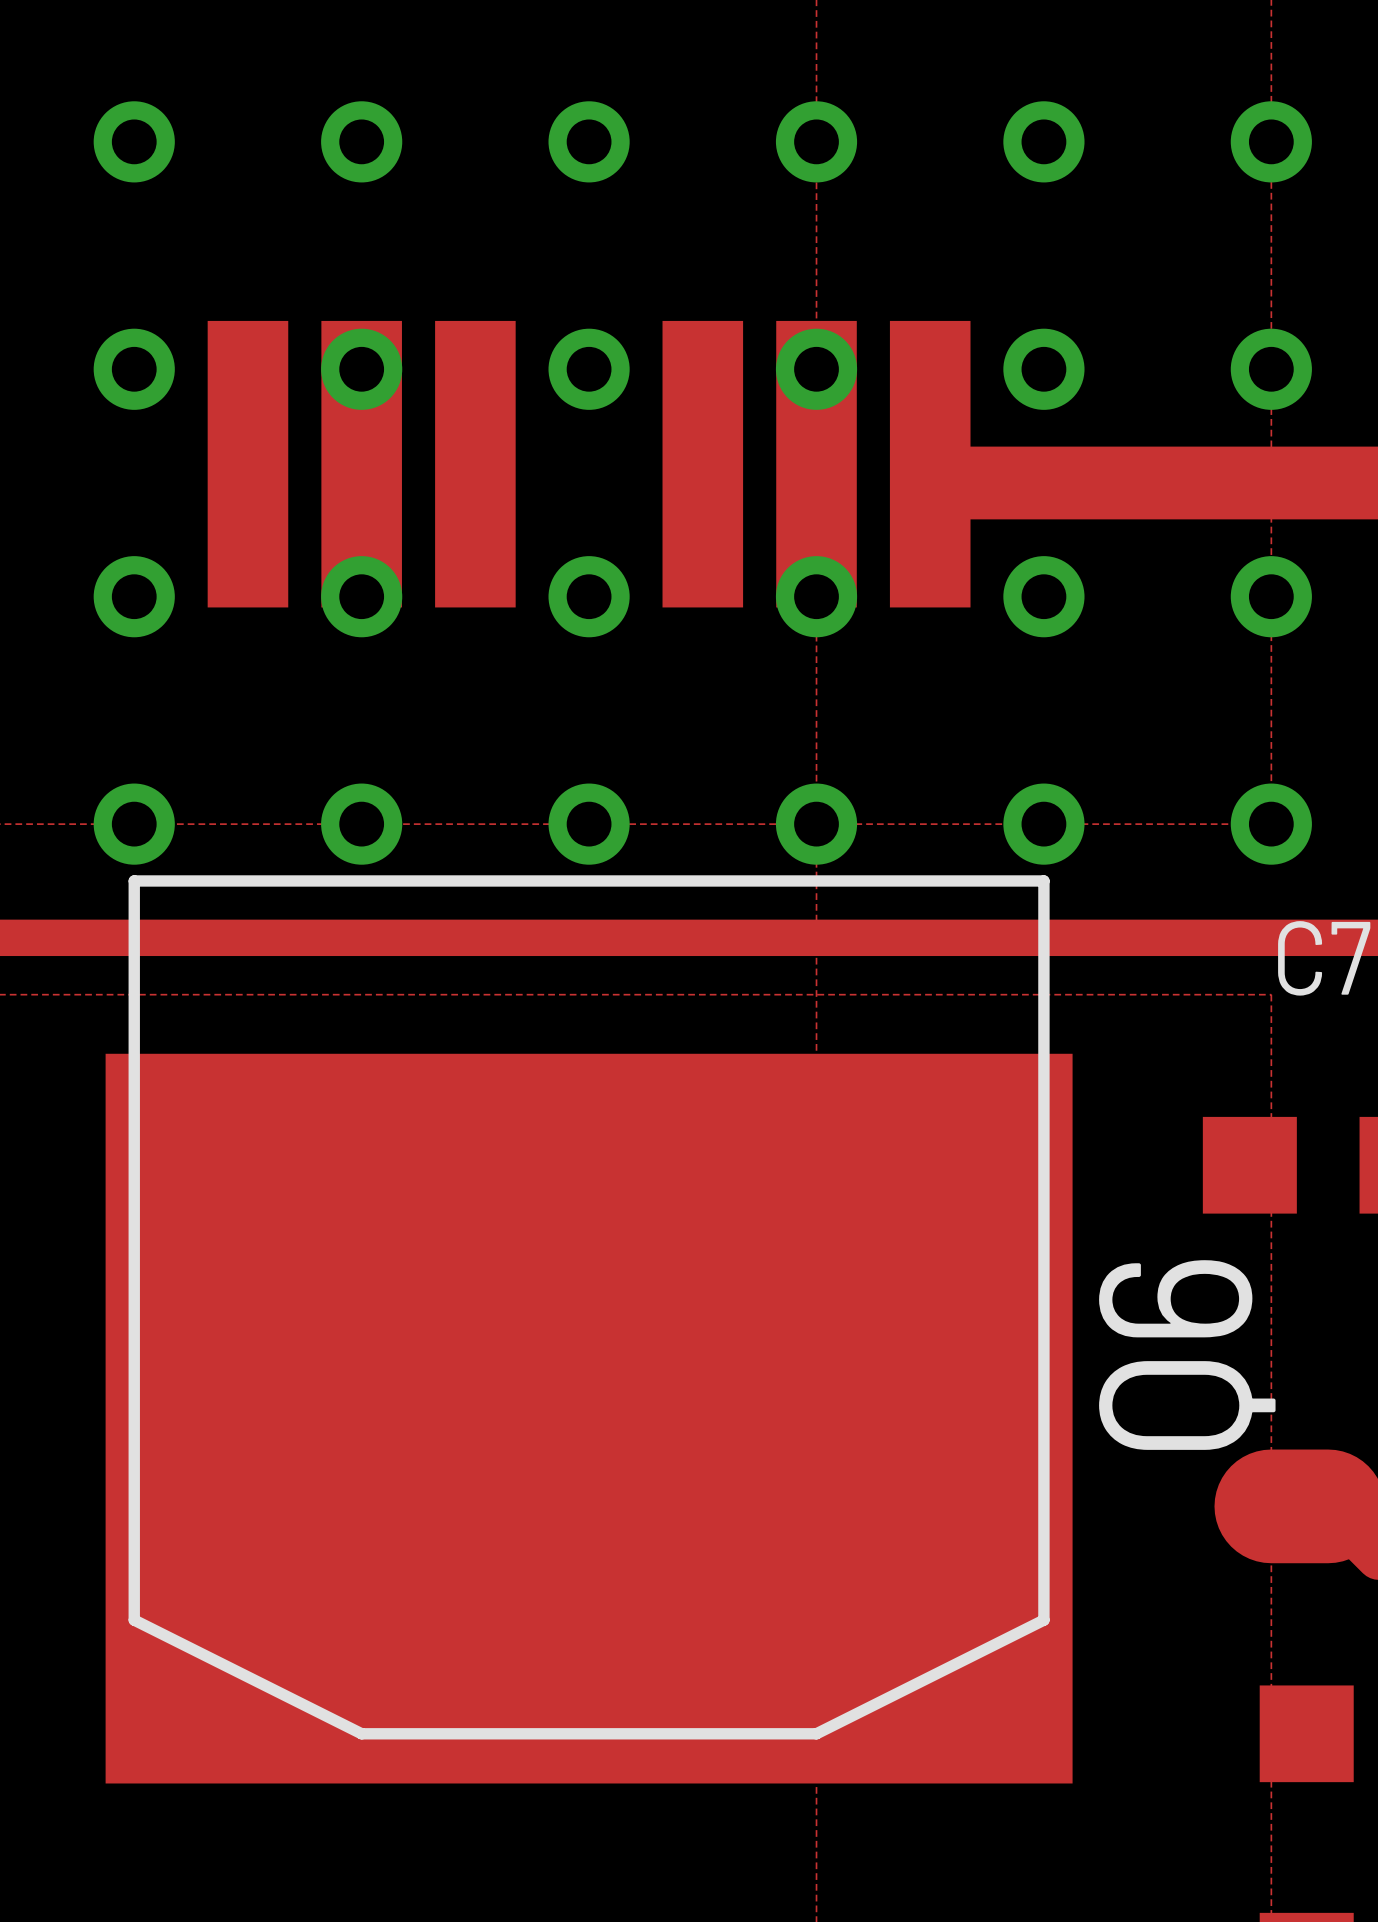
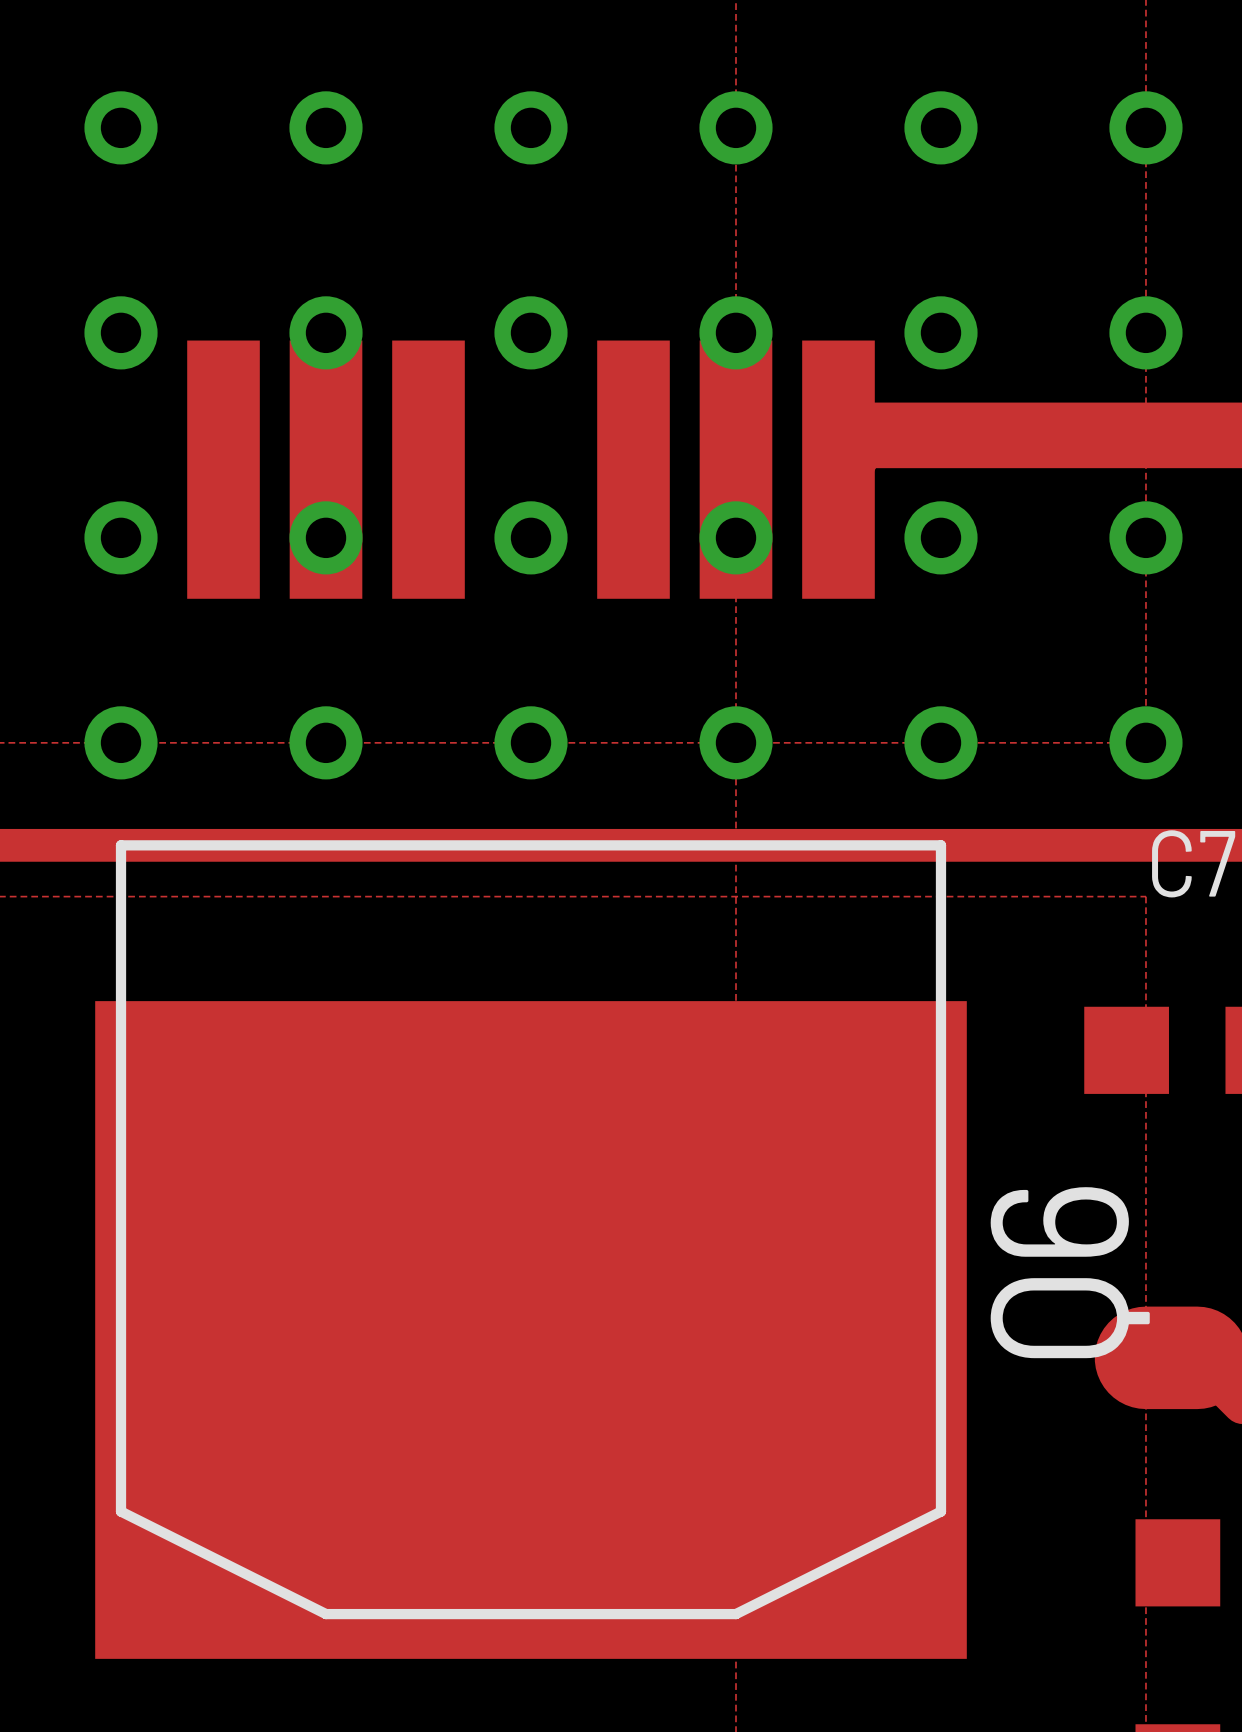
Q6 position: (589, 1052) -> (531, 999)

